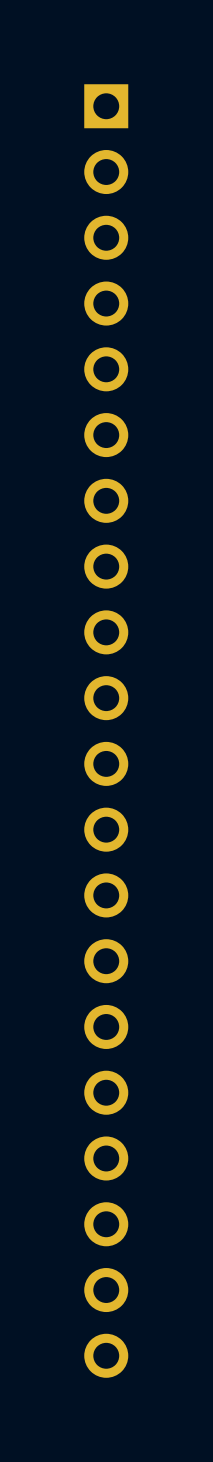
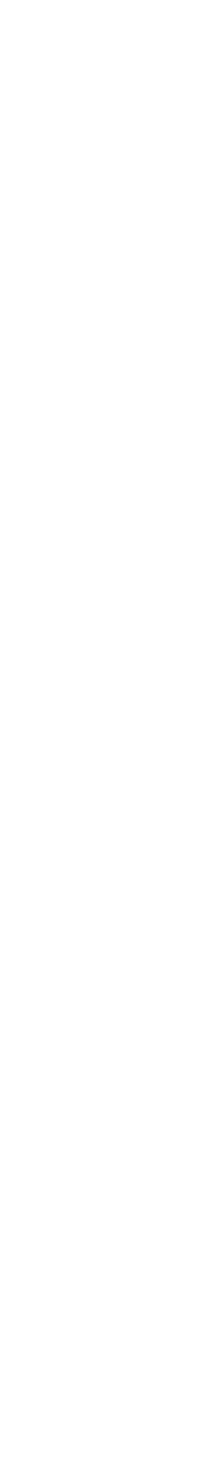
part: (106, 731) -> none

